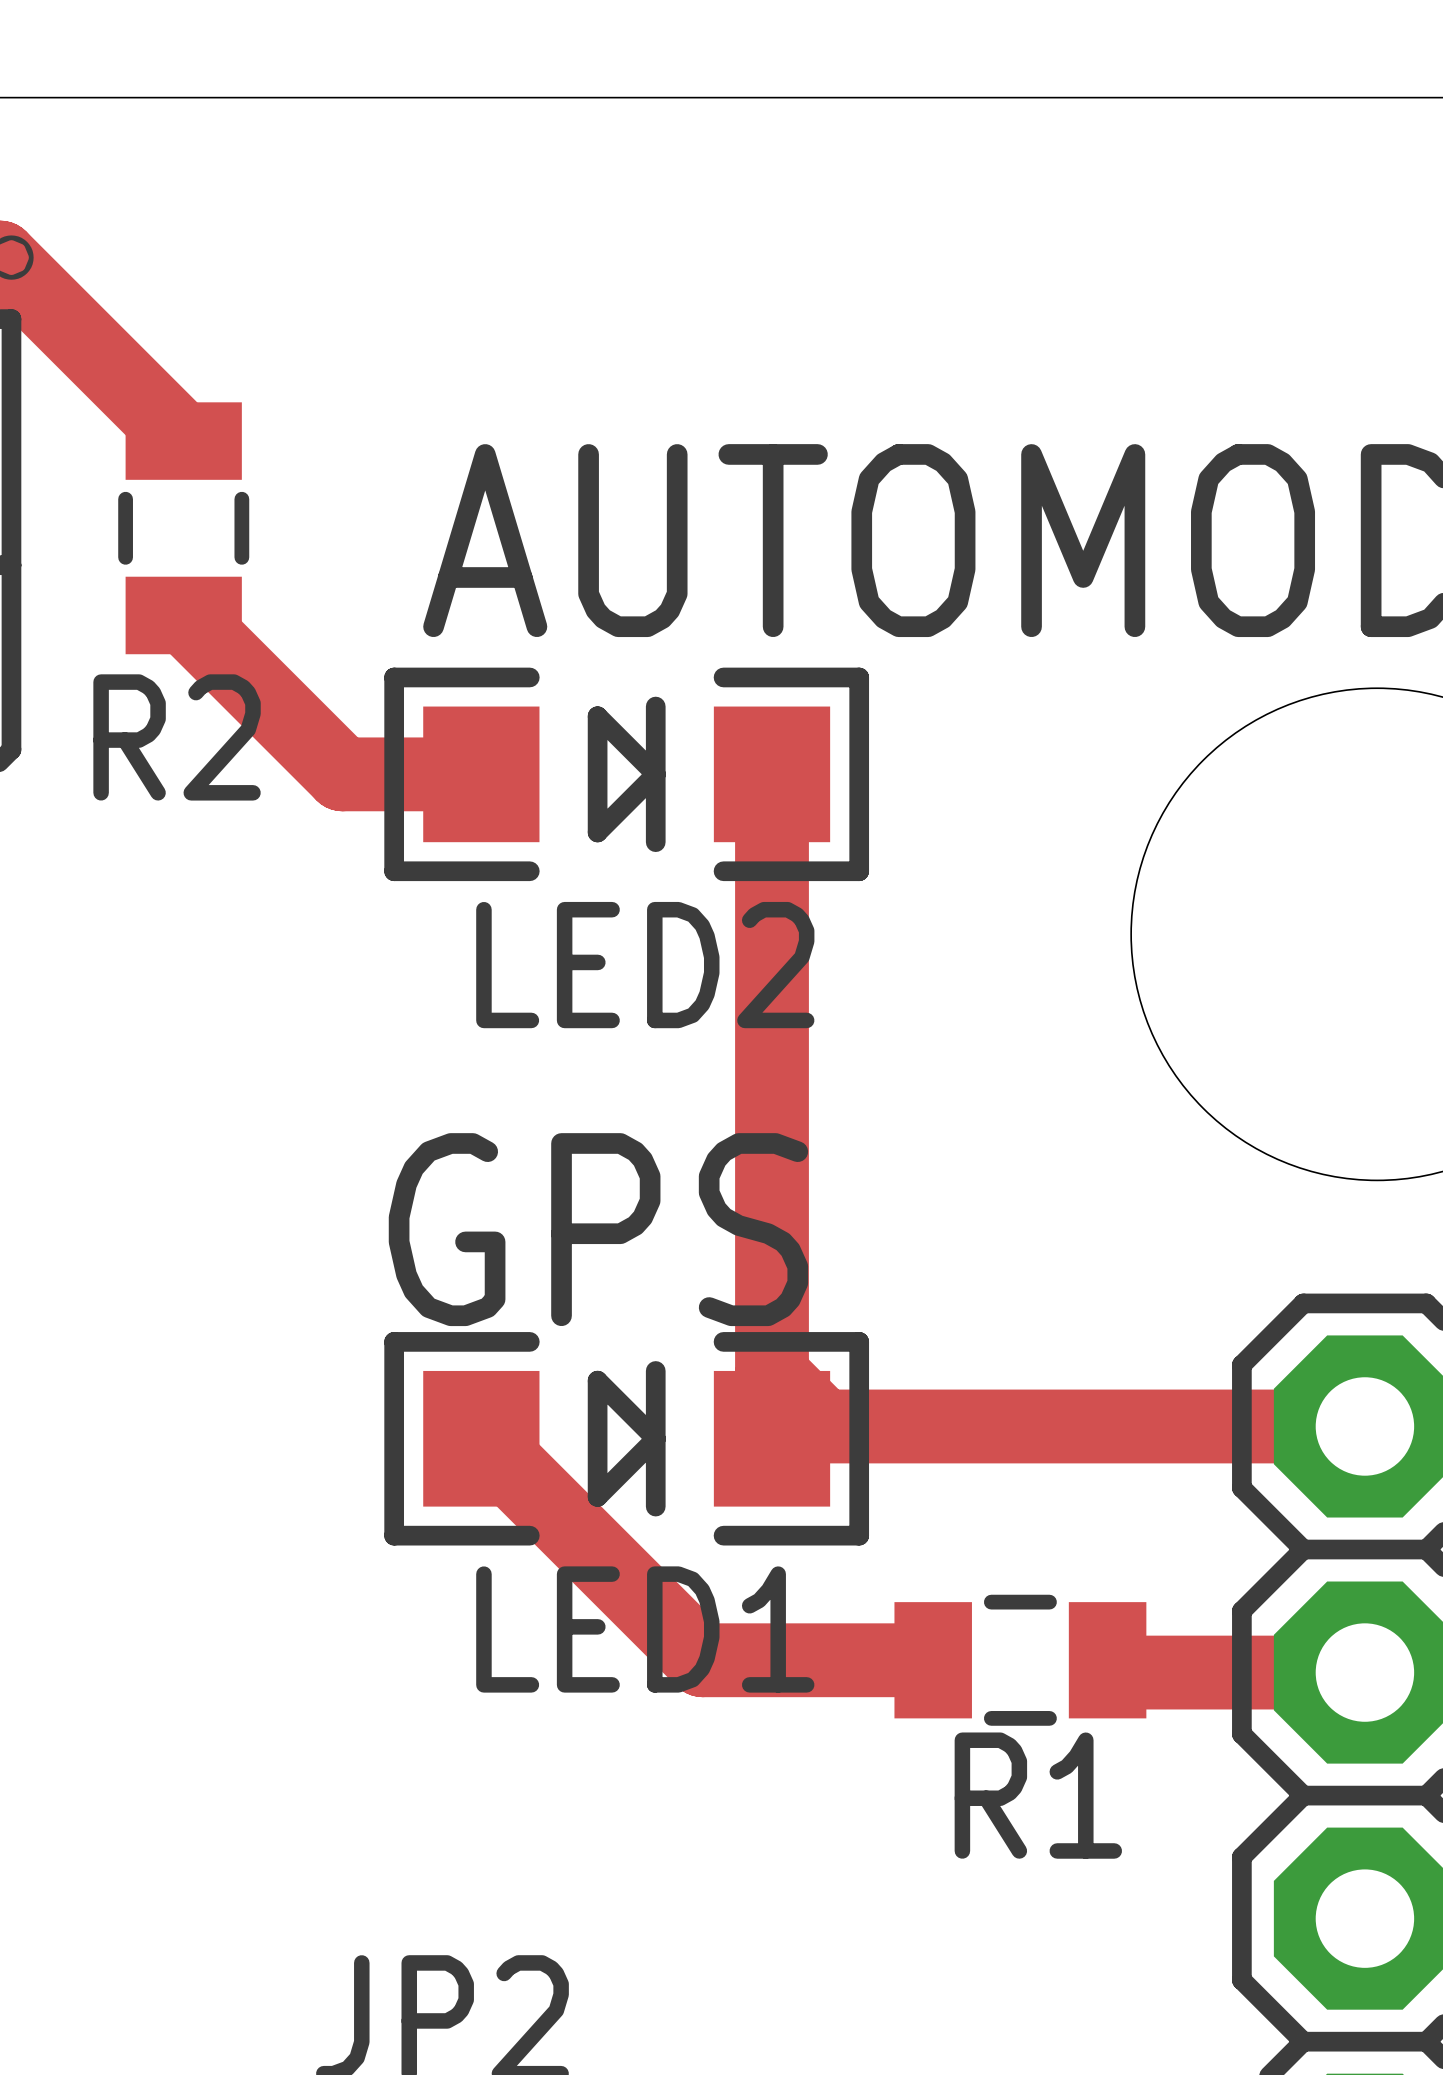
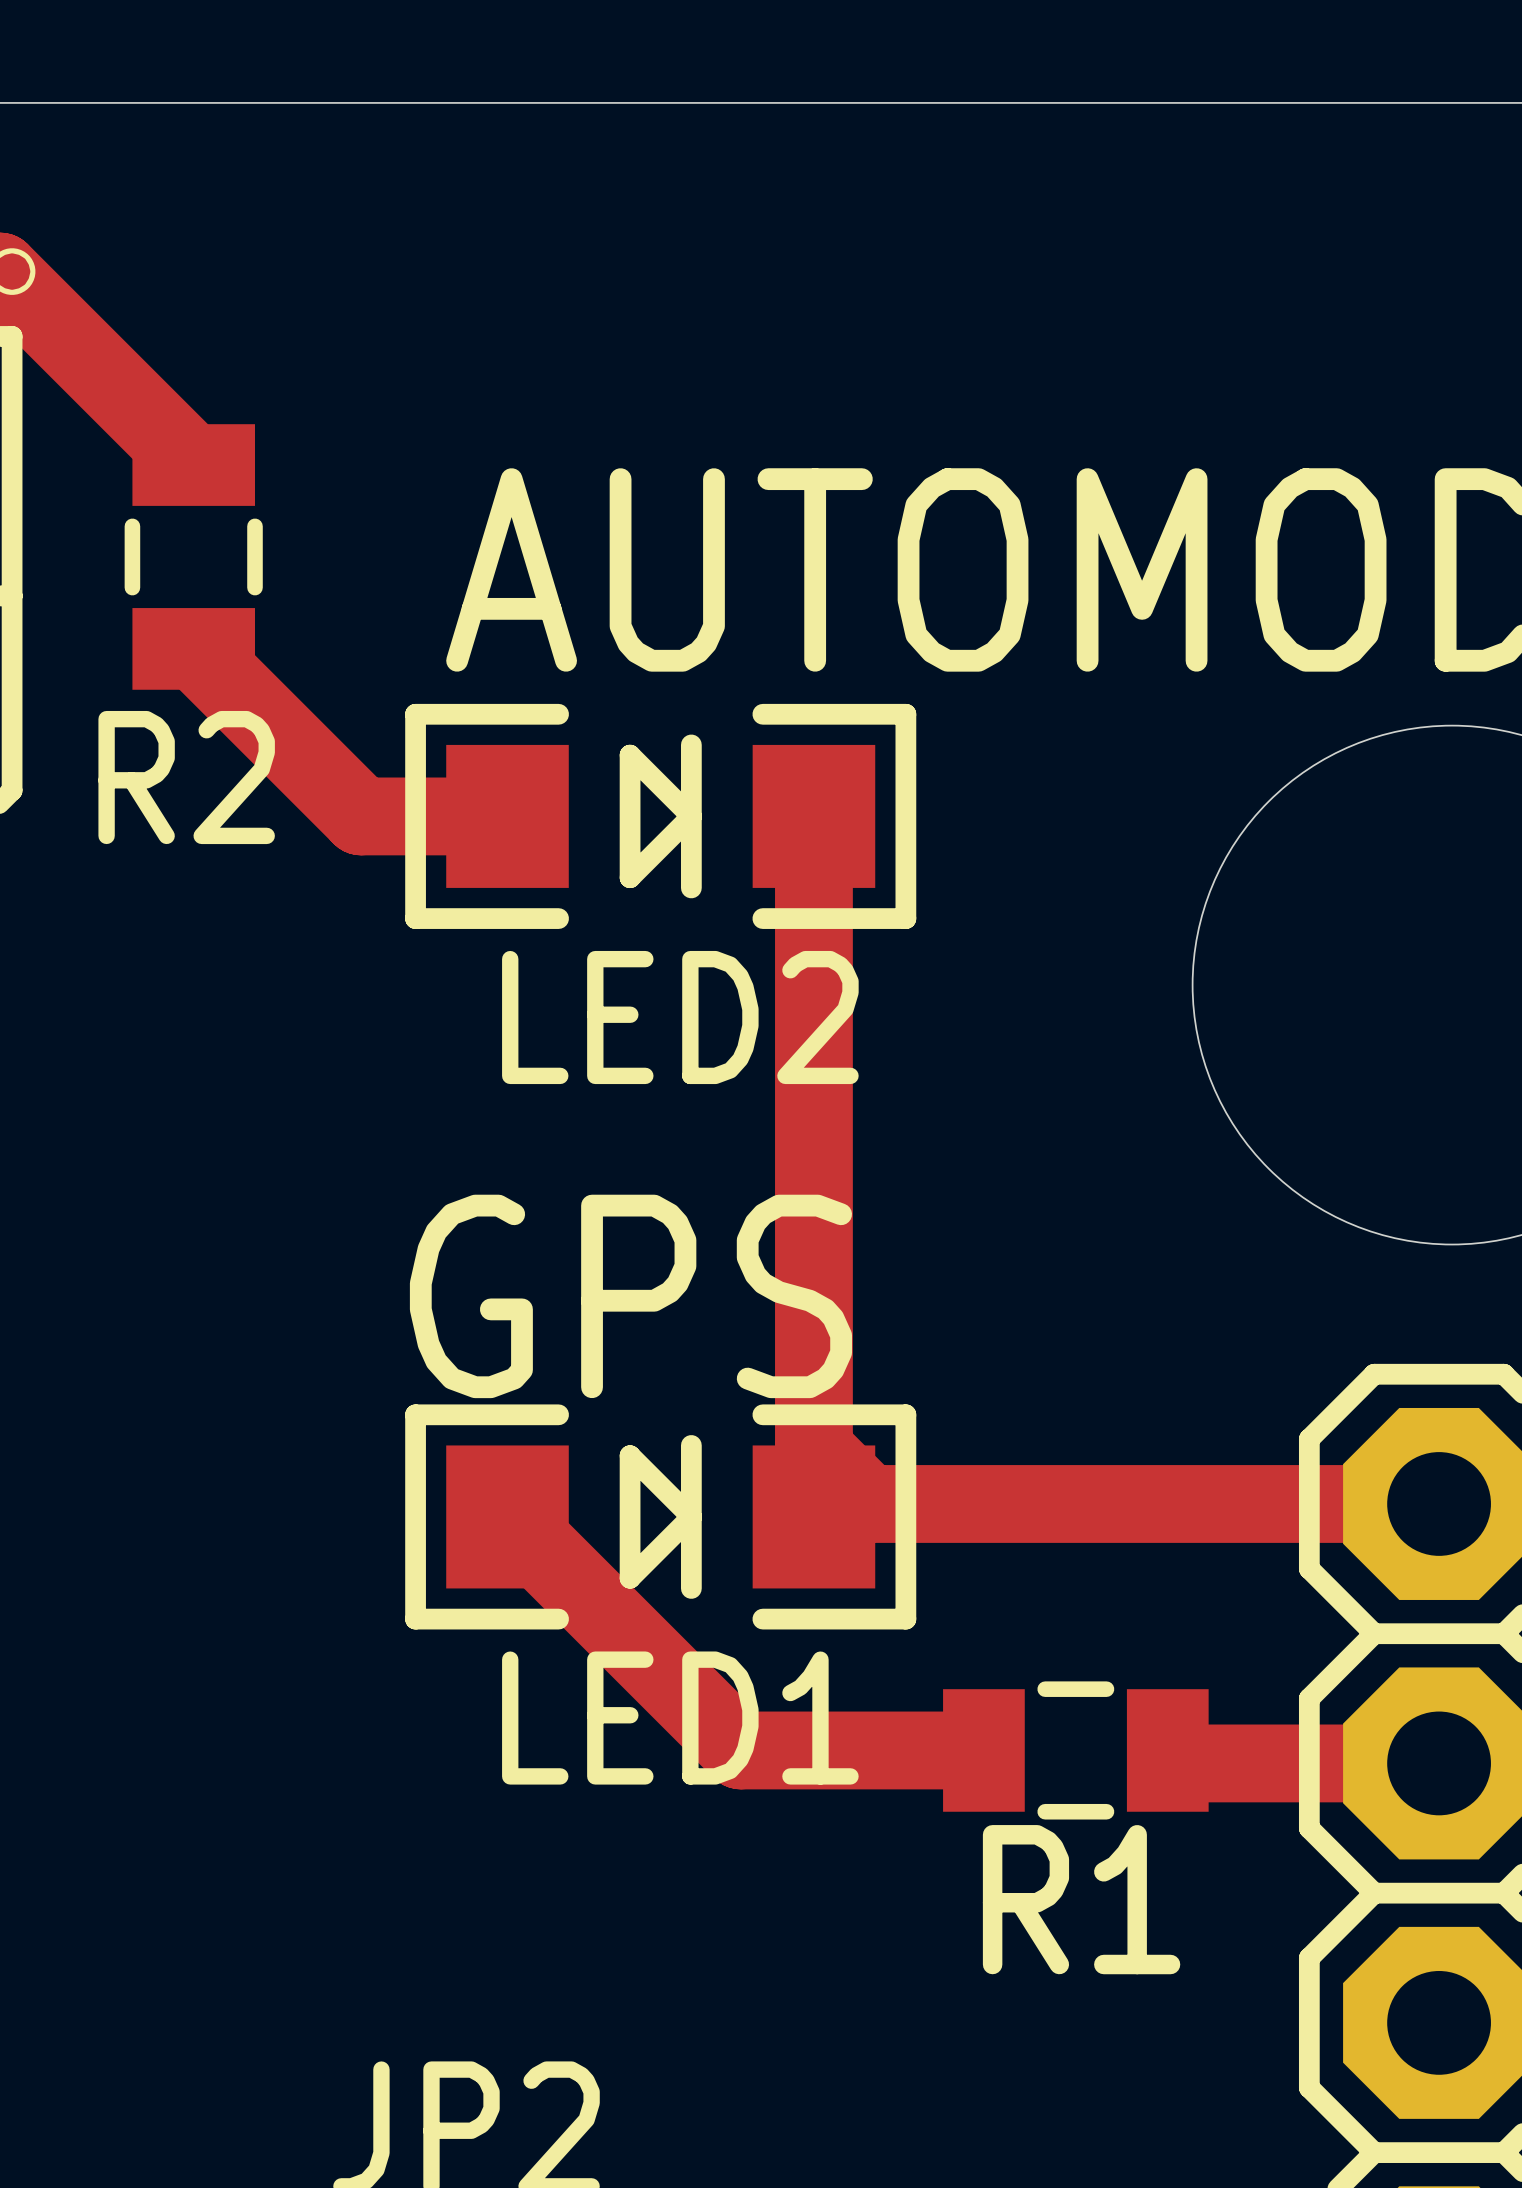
R1 name position: R1 (1038, 1795) -> R1 (1081, 1899)

